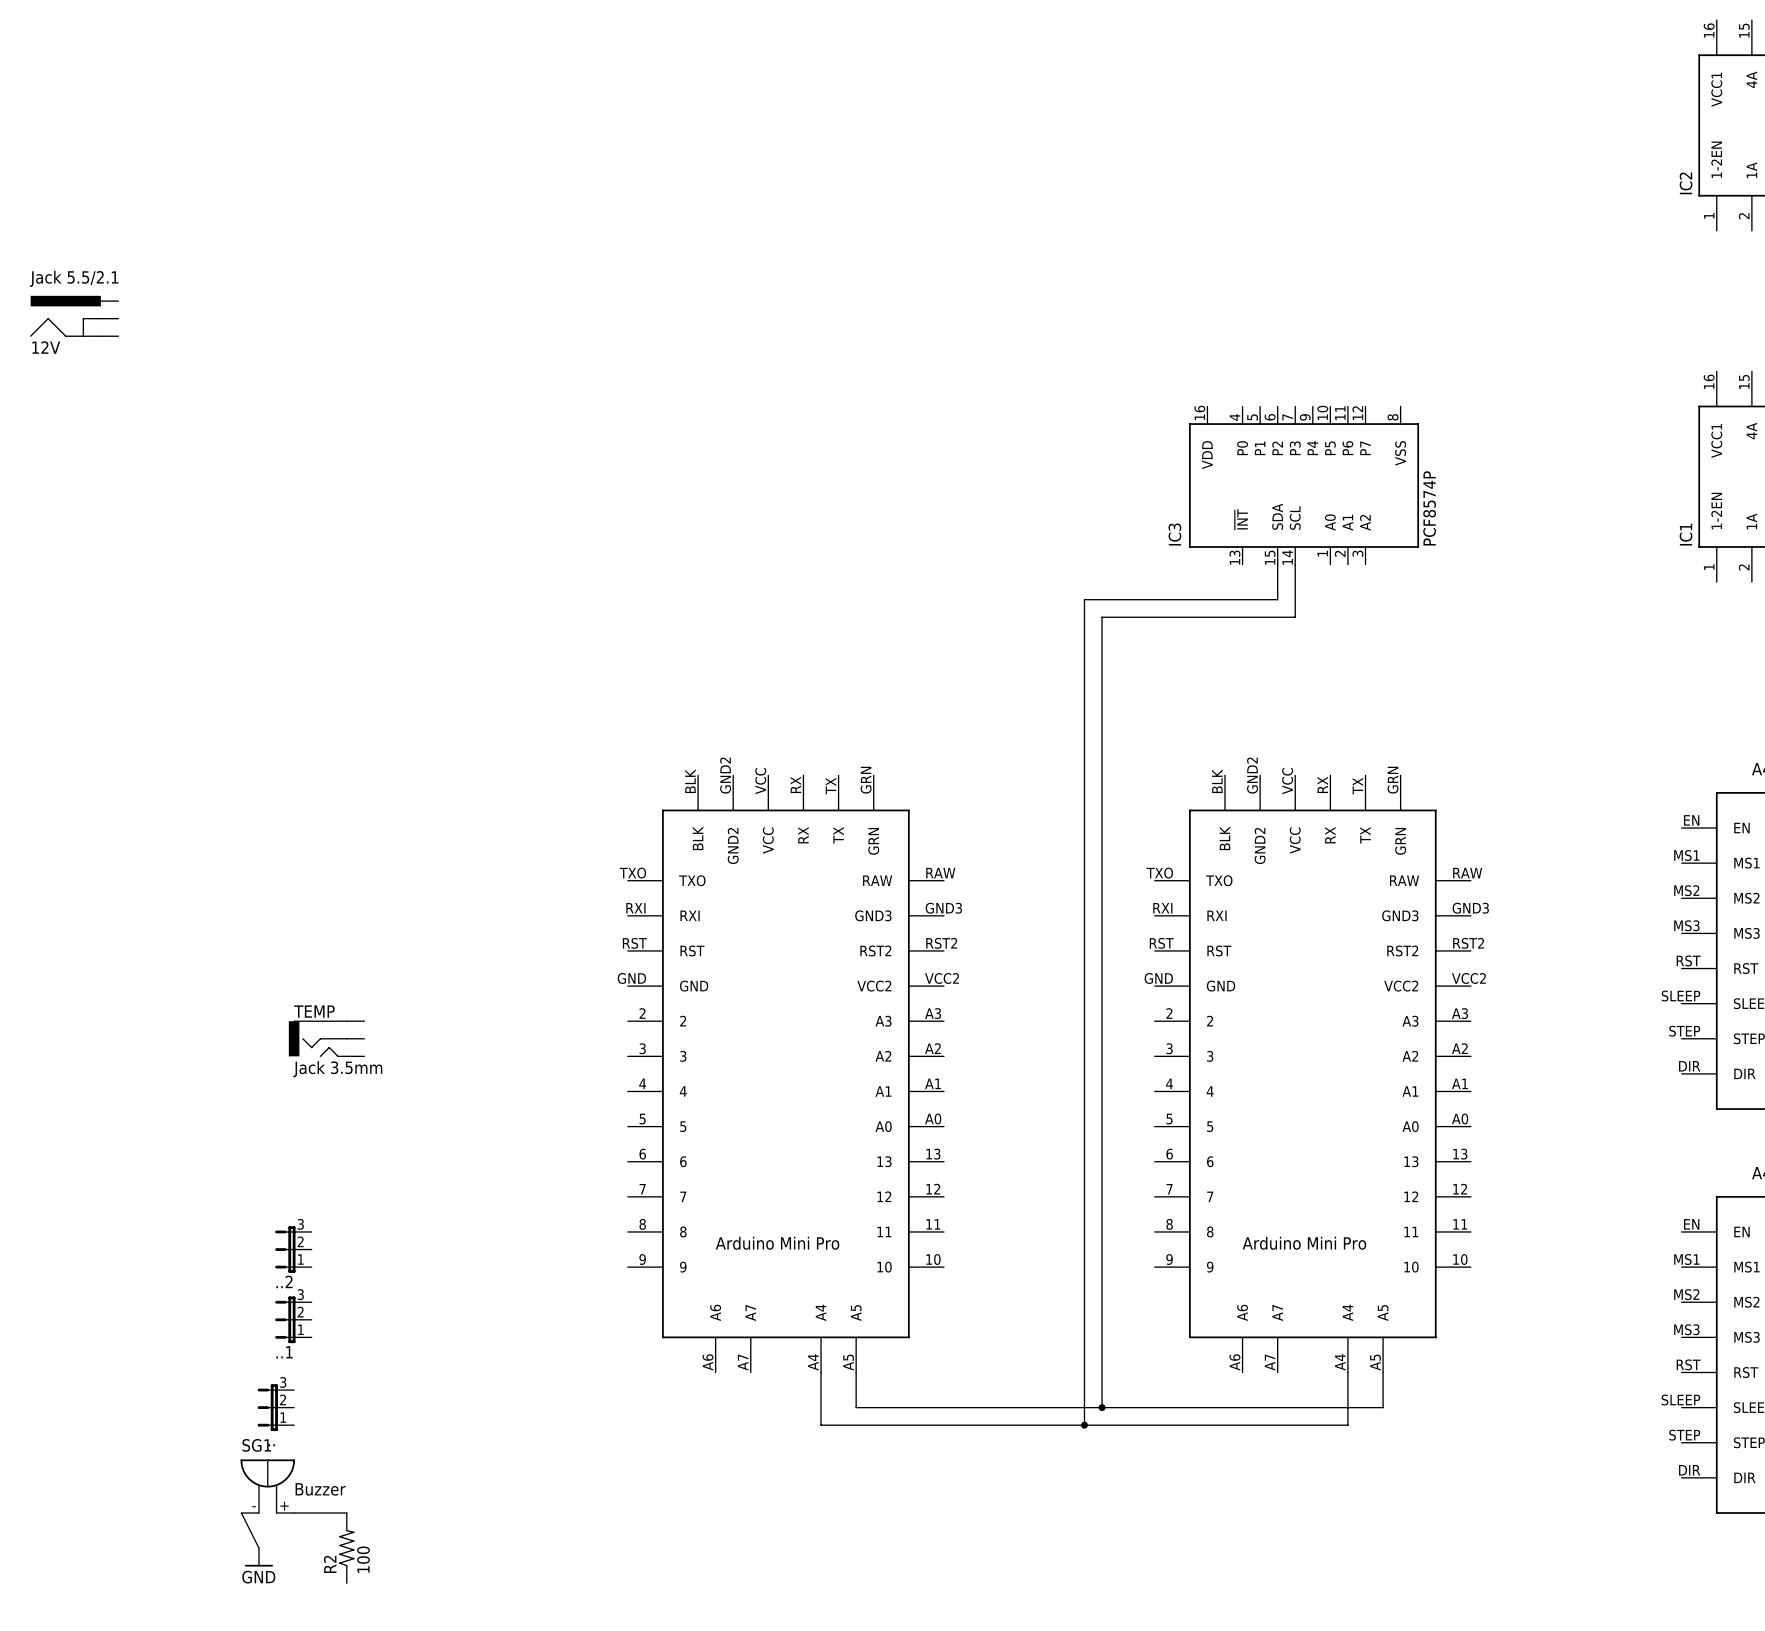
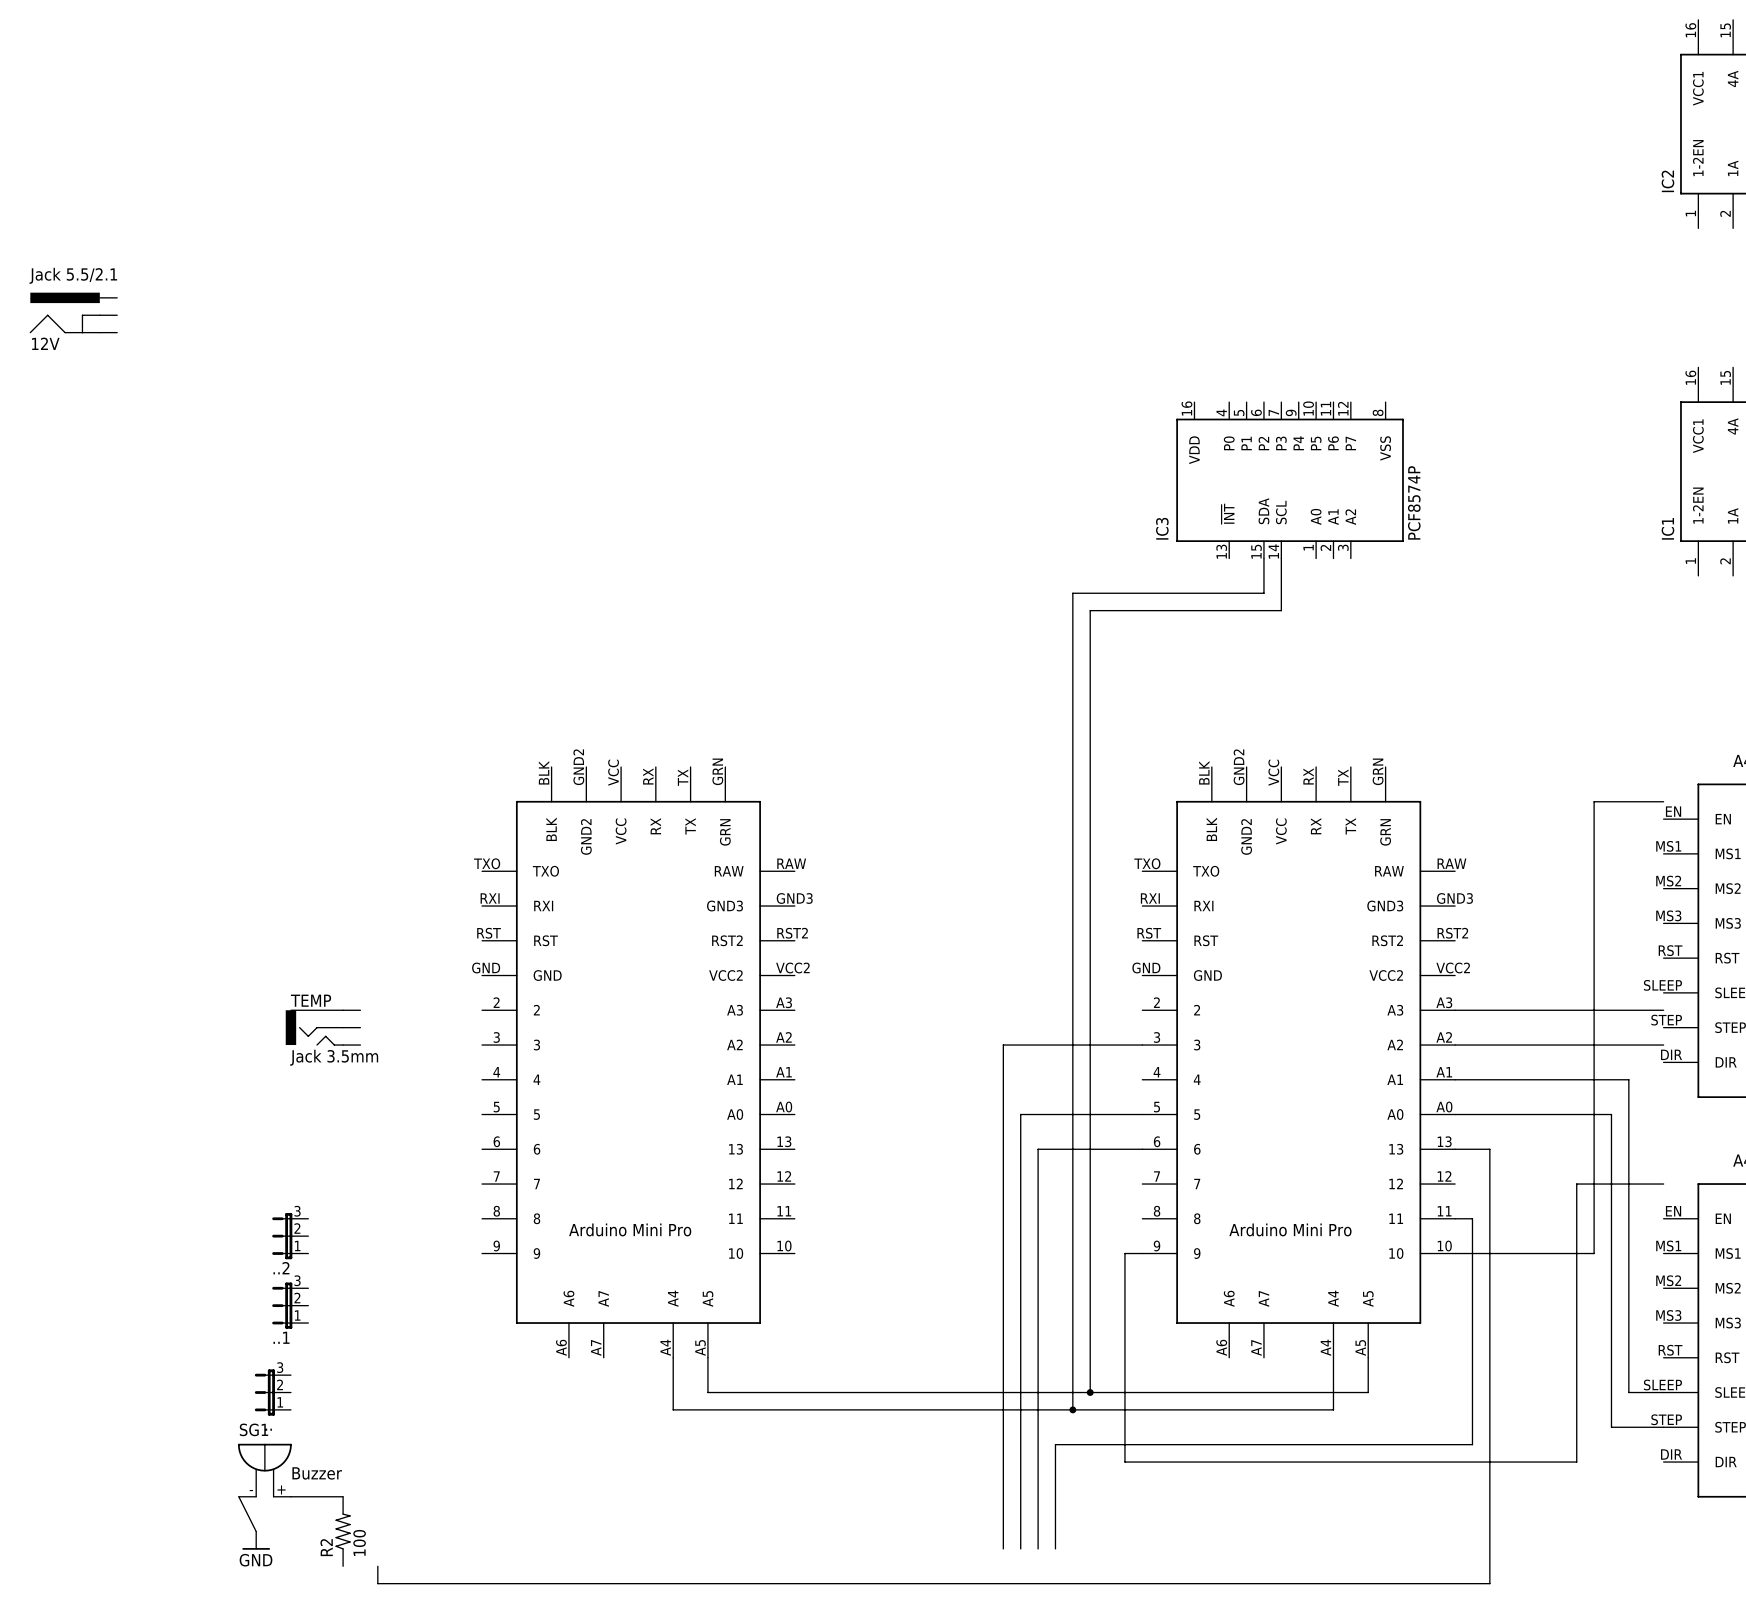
wire: none -> (1663, 801) (1594, 801) (1594, 1253) (1455, 1253)
wire: none -> (1455, 1010) (1663, 1010)
wire: none -> (1142, 1045) (1003, 1045) (1003, 1548)
wire: none -> (1455, 1045) (1663, 1045)
part position: (785, 1073) -> (638, 1062)
wire: none -> (1455, 1079) (1628, 1079) (1628, 1392) (1663, 1392)
wire: none -> (1142, 1114) (1020, 1114) (1020, 1548)
wire: none -> (1455, 1114) (1611, 1114) (1611, 1427) (1663, 1427)
wire: none -> (1142, 1149) (1038, 1149) (1038, 1548)
wire: none -> (1455, 1149) (1489, 1149) (1489, 1583) (377, 1583) (377, 1566)
wire: none -> (1663, 1184) (1576, 1184) (1576, 1462) (1124, 1462) (1124, 1253) (1142, 1253)
wire: none -> (1455, 1218) (1472, 1218) (1472, 1444) (1055, 1444) (1055, 1548)
wire: (821, 1372) (821, 1425) -> (673, 1357) (673, 1409) (812, 1409)
wire: (856, 1372) (856, 1407) -> (707, 1357) (707, 1392) (846, 1392)

